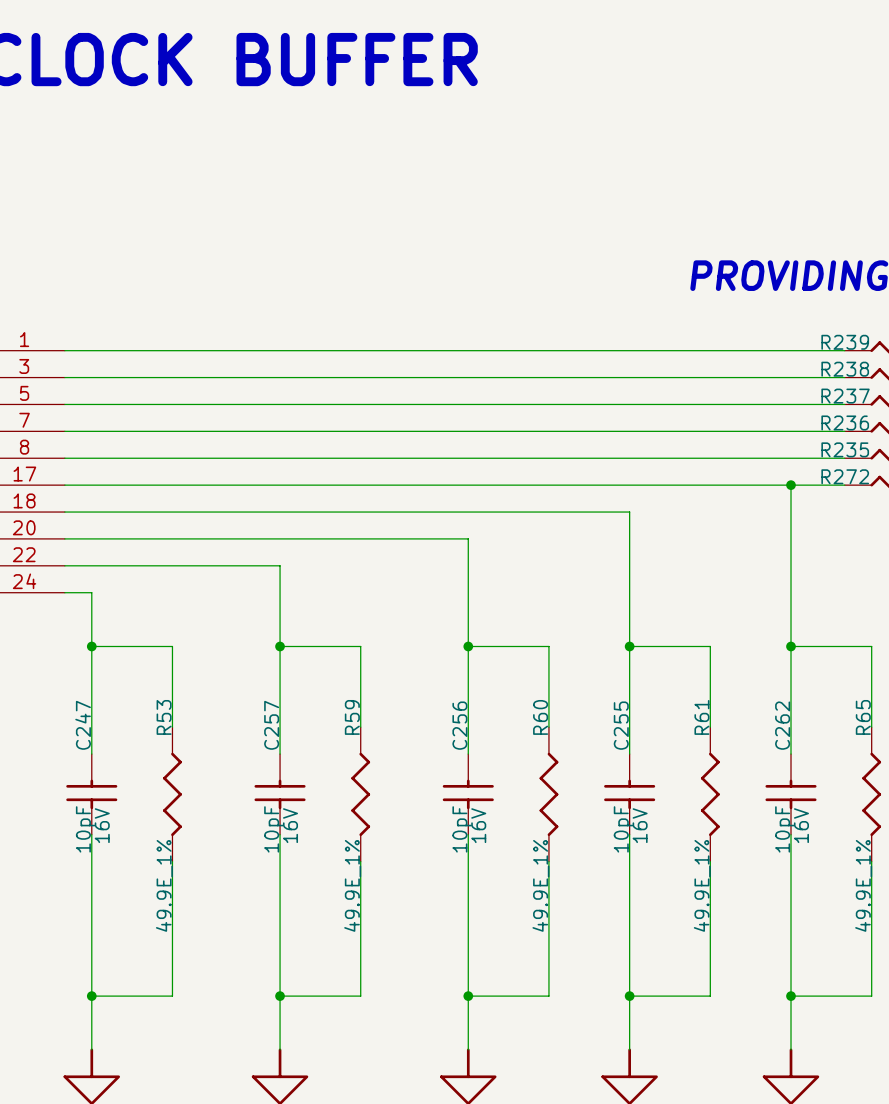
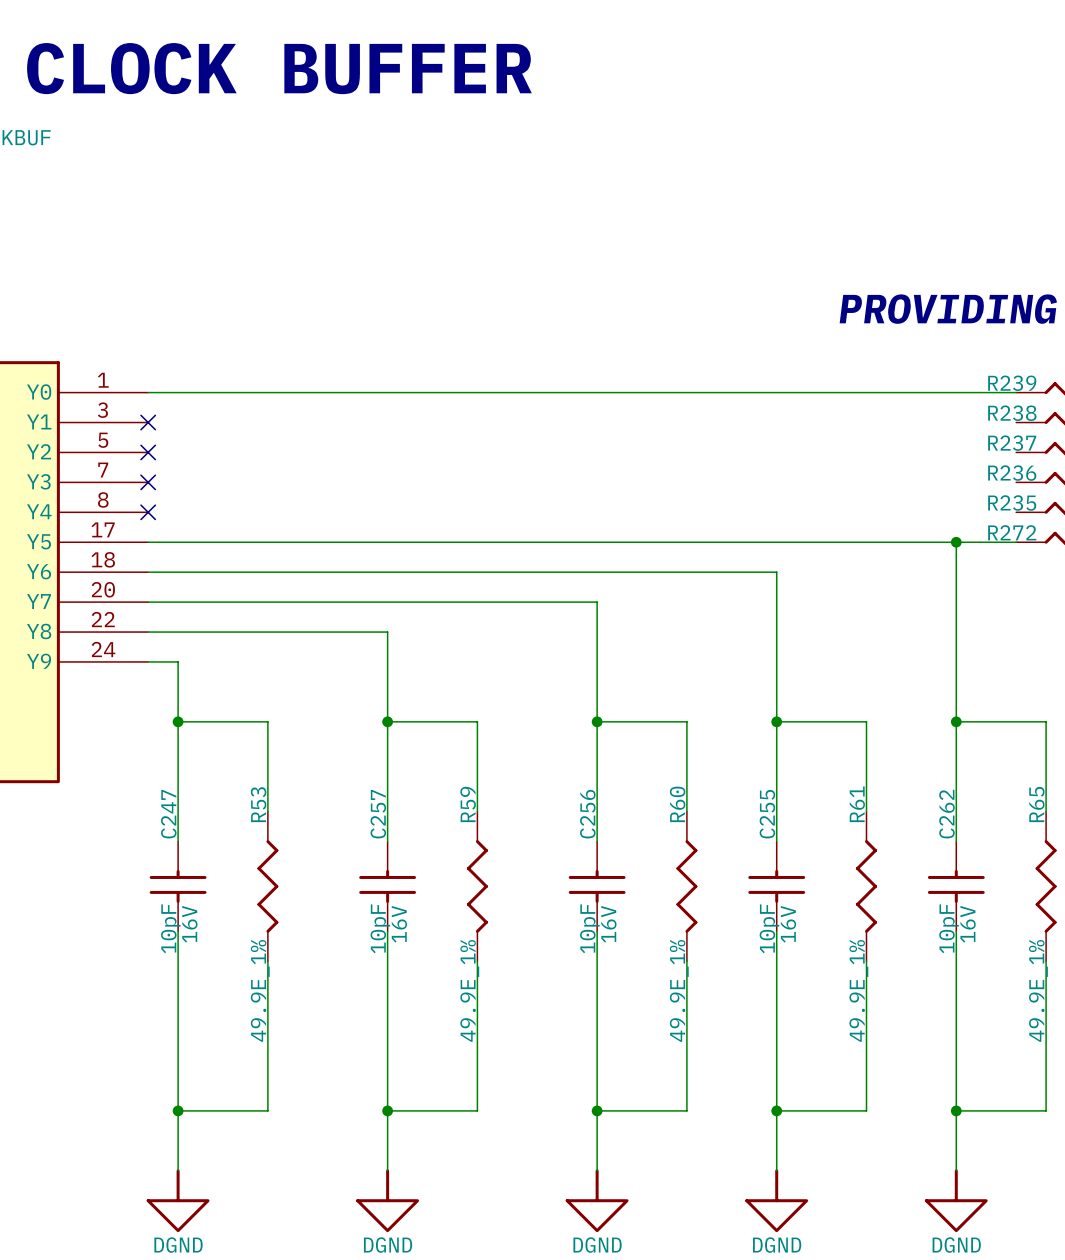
wire: (64, 377) (844, 377) -> none
no-connect mark: none -> (148, 422)
wire: (64, 404) (844, 404) -> none
no-connect mark: none -> (148, 452)
wire: (64, 431) (844, 431) -> none
no-connect mark: none -> (148, 482)
wire: (64, 458) (844, 458) -> none
no-connect mark: none -> (148, 512)

